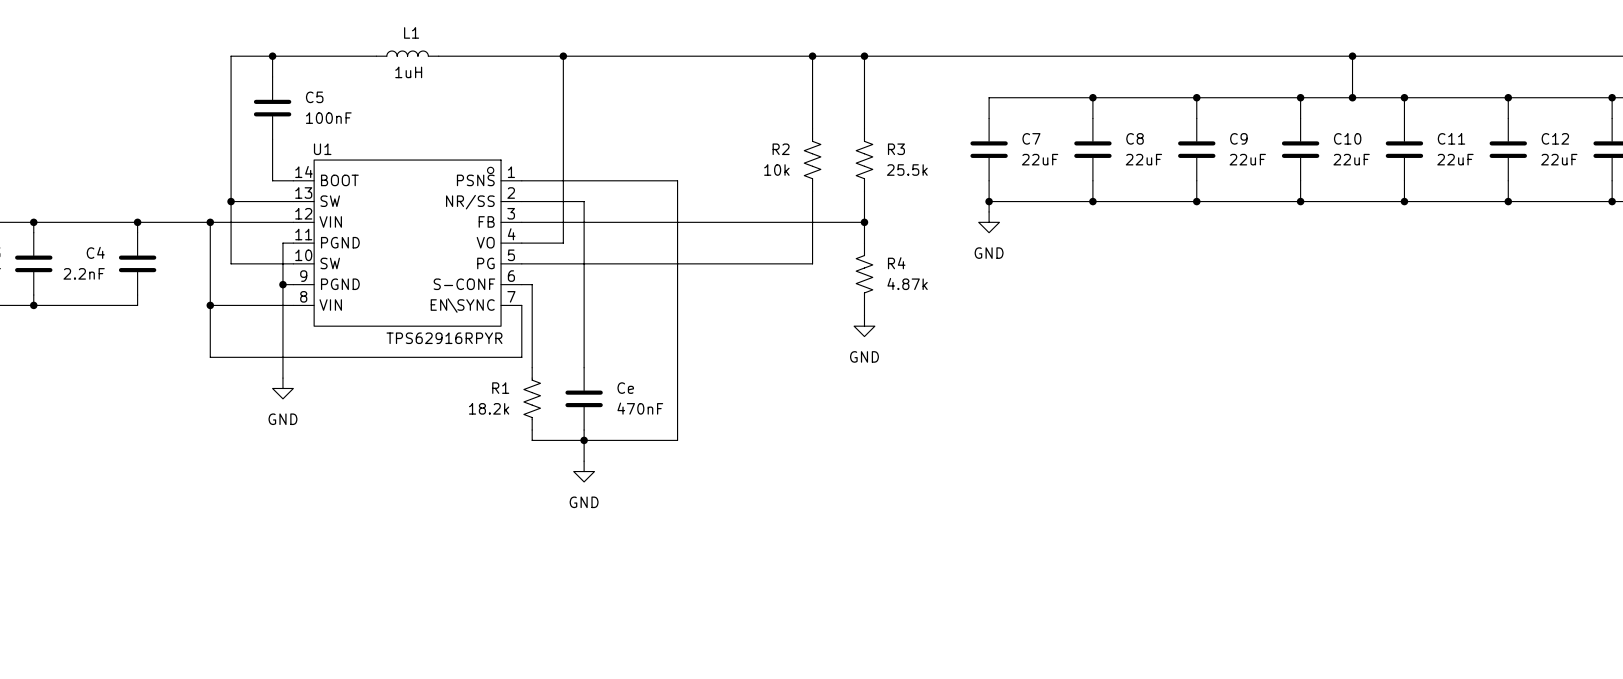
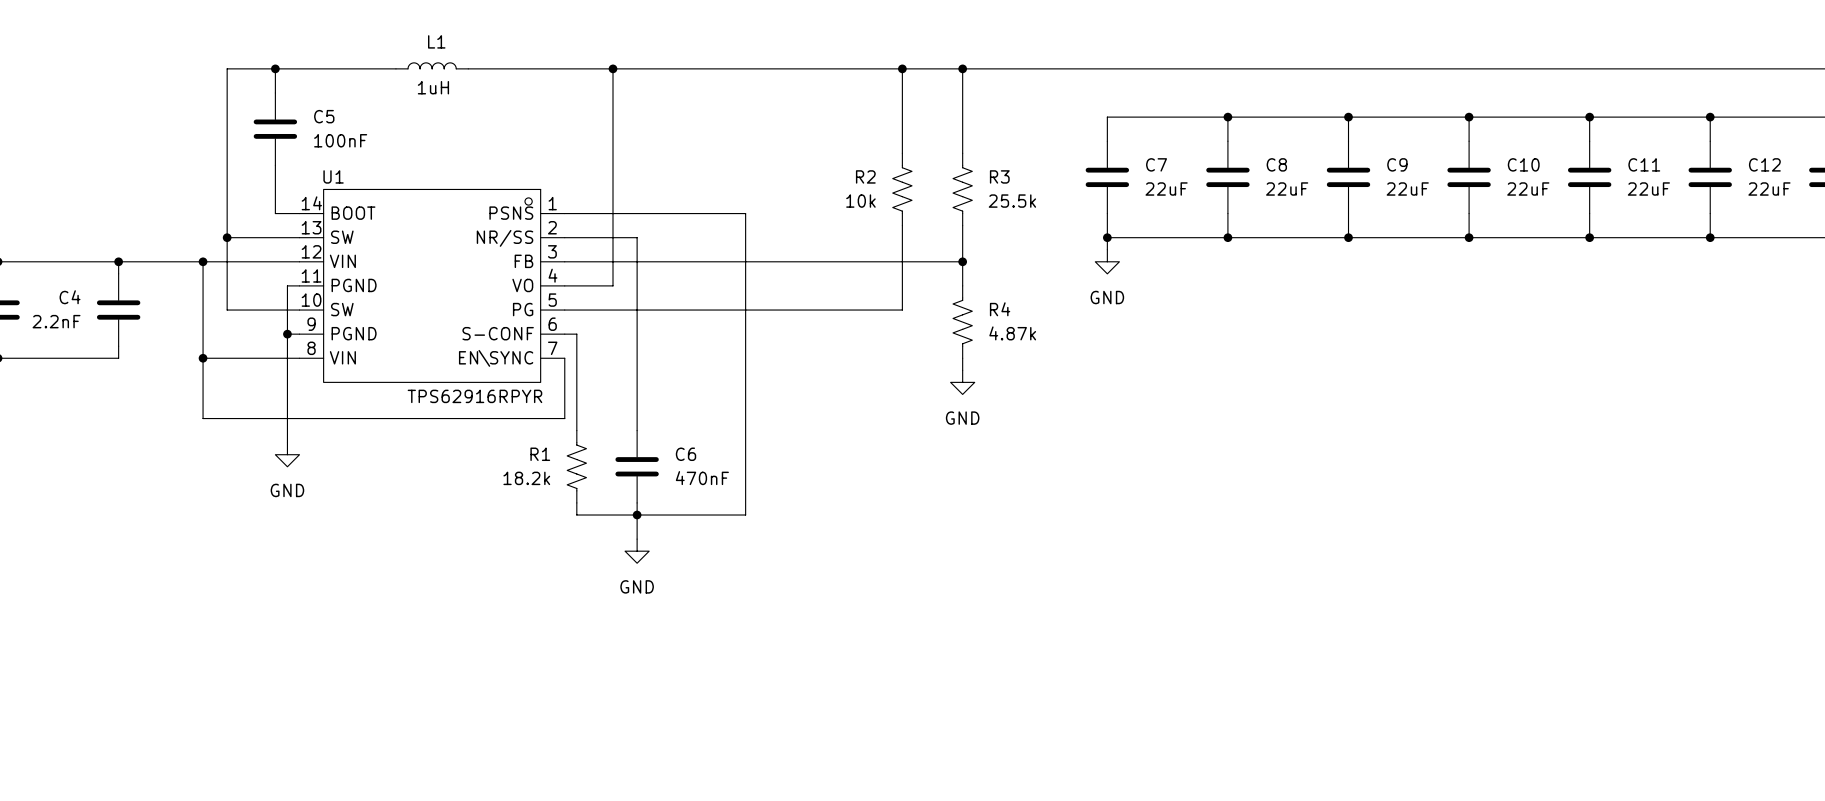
wire: (1352, 56) (1352, 97) -> none
junction: (1352, 56) -> none
junction: (1352, 97) -> none
Ce name: Ce (625, 388) -> C6 (686, 454)

